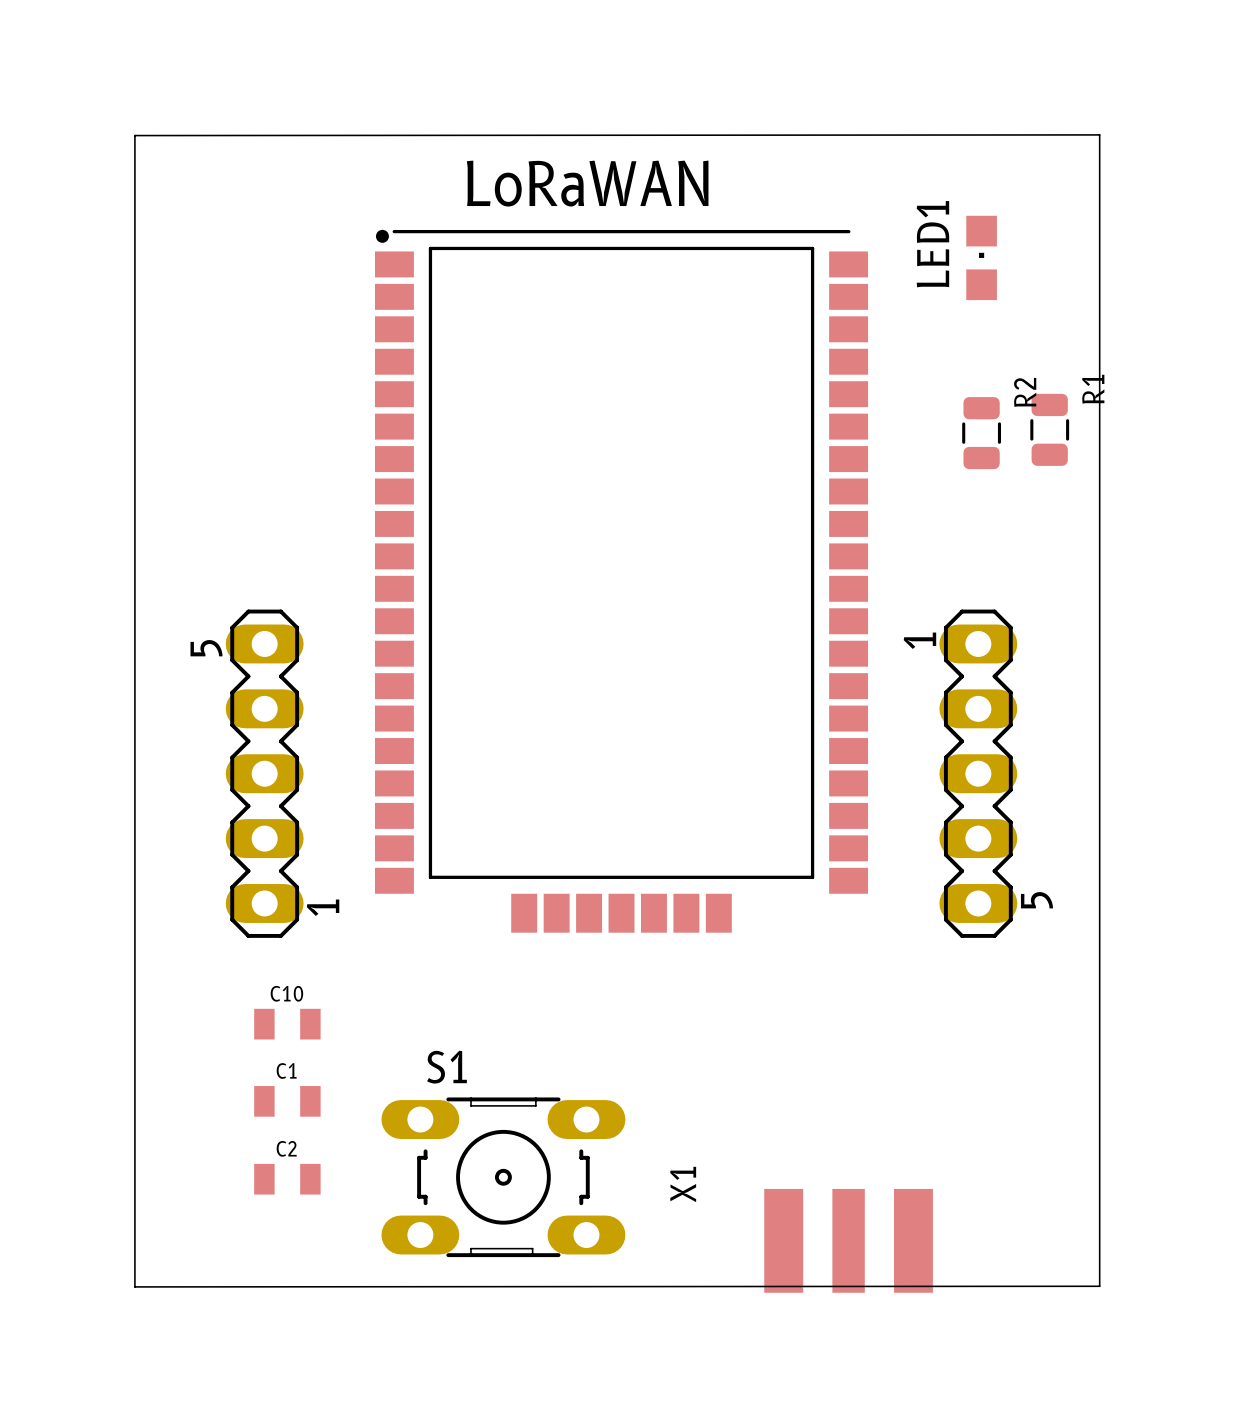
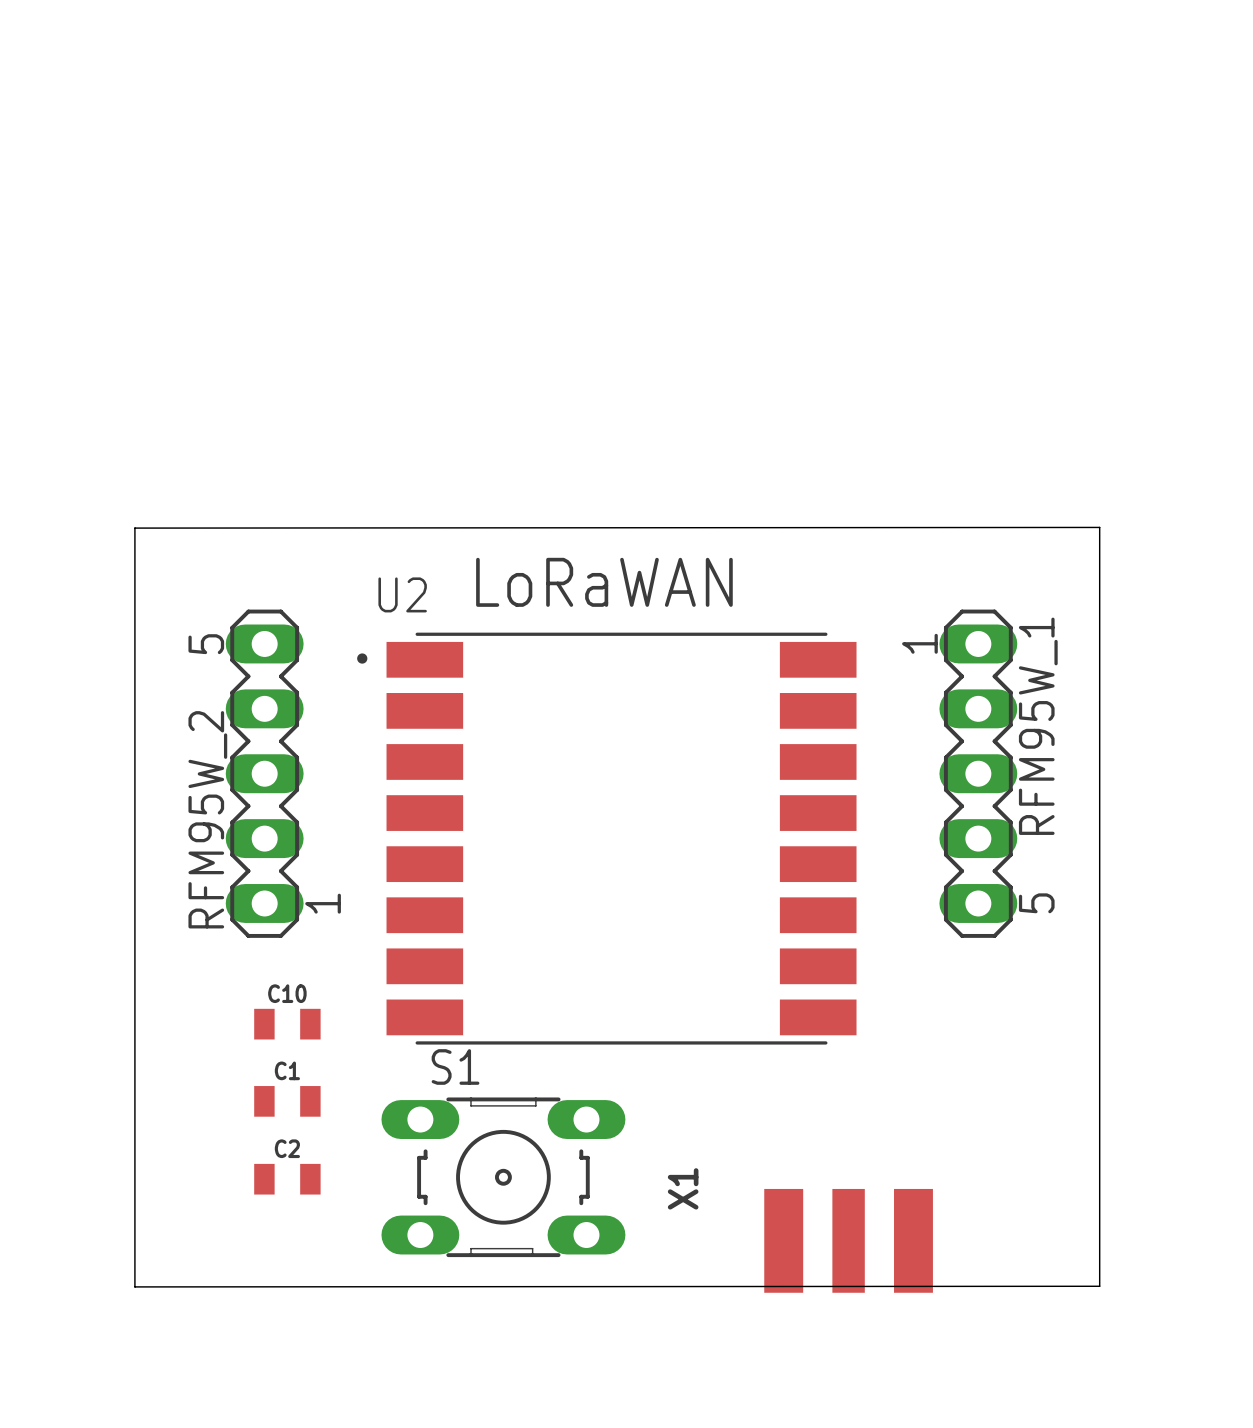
text position: LoRaWAN (587, 183) -> LoRaWAN (604, 582)
LED1: (981, 257) -> none
R1: (1049, 429) -> none
R2: (981, 433) -> none
board edge: (1099, 527) (1099, 134) (134, 135) (134, 528) -> (1099, 527) (134, 528)
part: (621, 581) -> none
RFM95W_1 name: none -> RFM95W_1 (1038, 726)
RFM95W_2 name: none -> RFM95W_2 (207, 819)
U2: none -> (606, 838)

